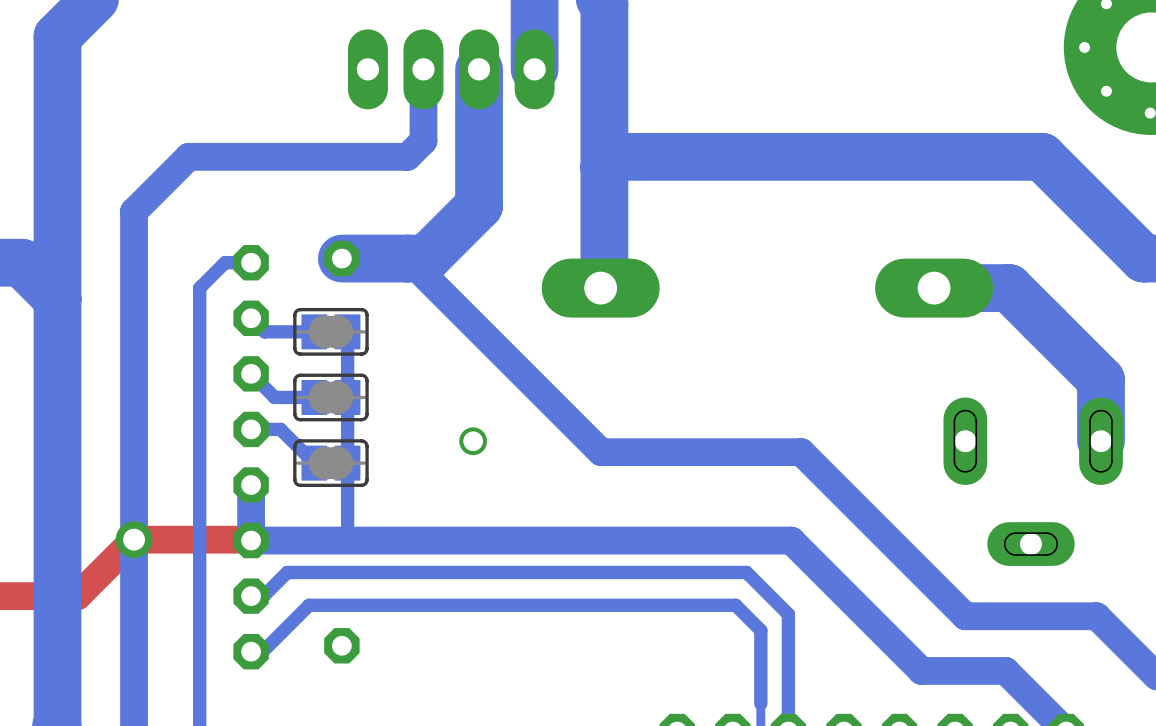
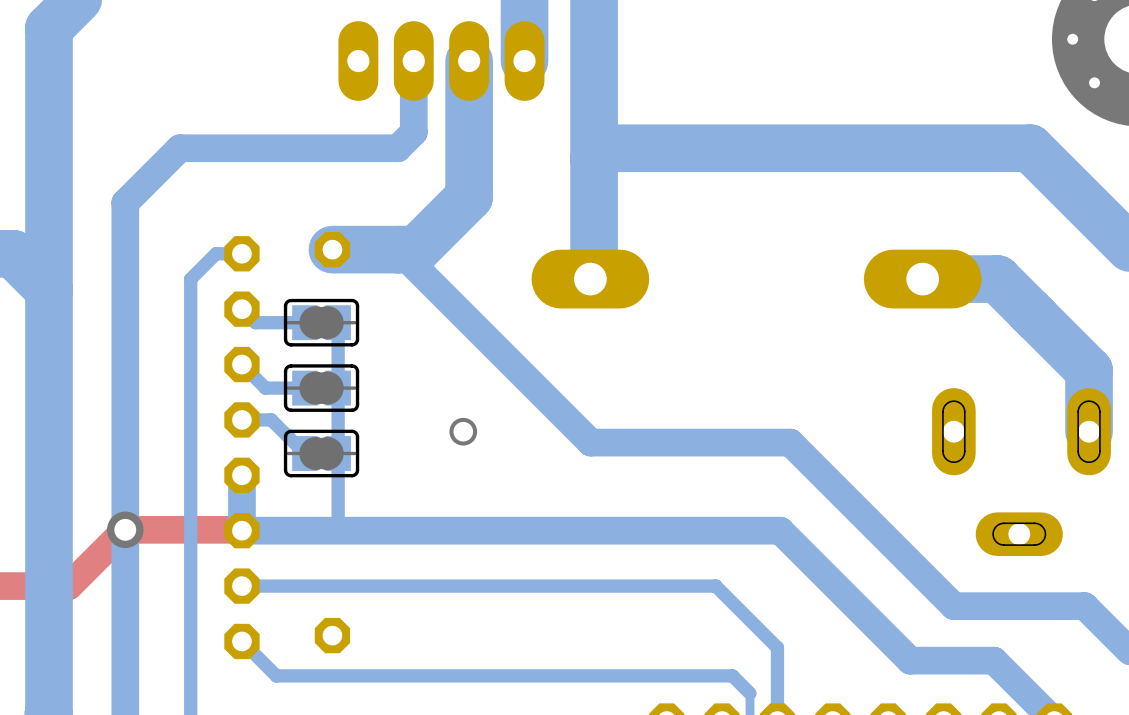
bottom track: (263, 596) (287, 572) (746, 572) (788, 614) (788, 658) -> none
bottom track: (735, 605) (309, 605) (262, 651) (251, 651) -> (724, 595) (715, 586) (254, 586)
bottom track: (760, 630) (760, 703) -> (749, 620) (777, 647)
bottom track: none -> (241, 641) (276, 675) (732, 675) (749, 693)

